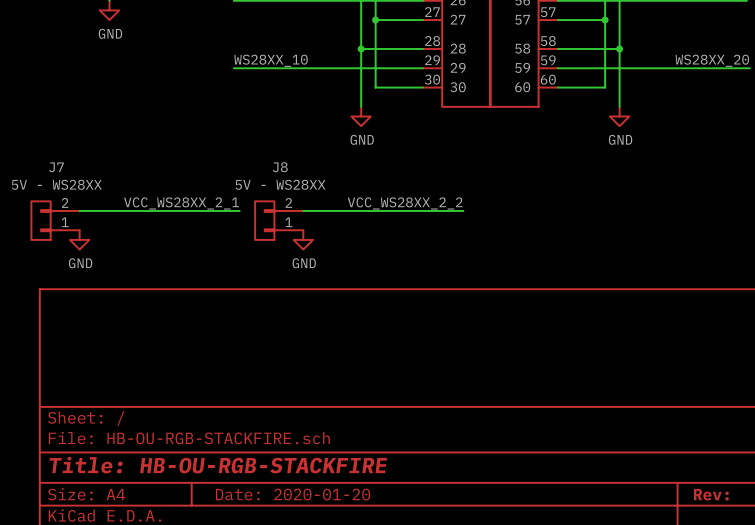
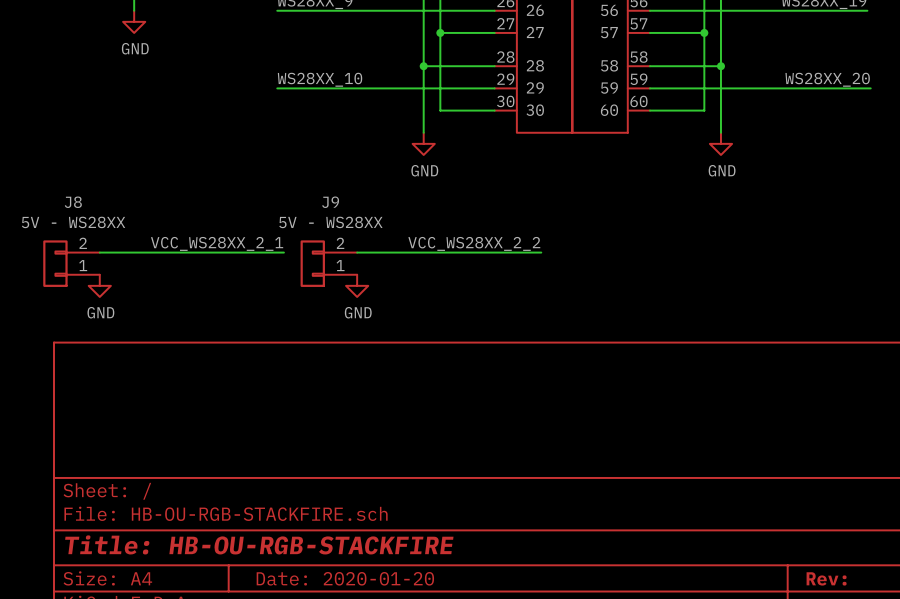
J7 name: J7 (56, 167) -> J8 (73, 202)
J8 name: J8 (280, 167) -> J9 (330, 202)

